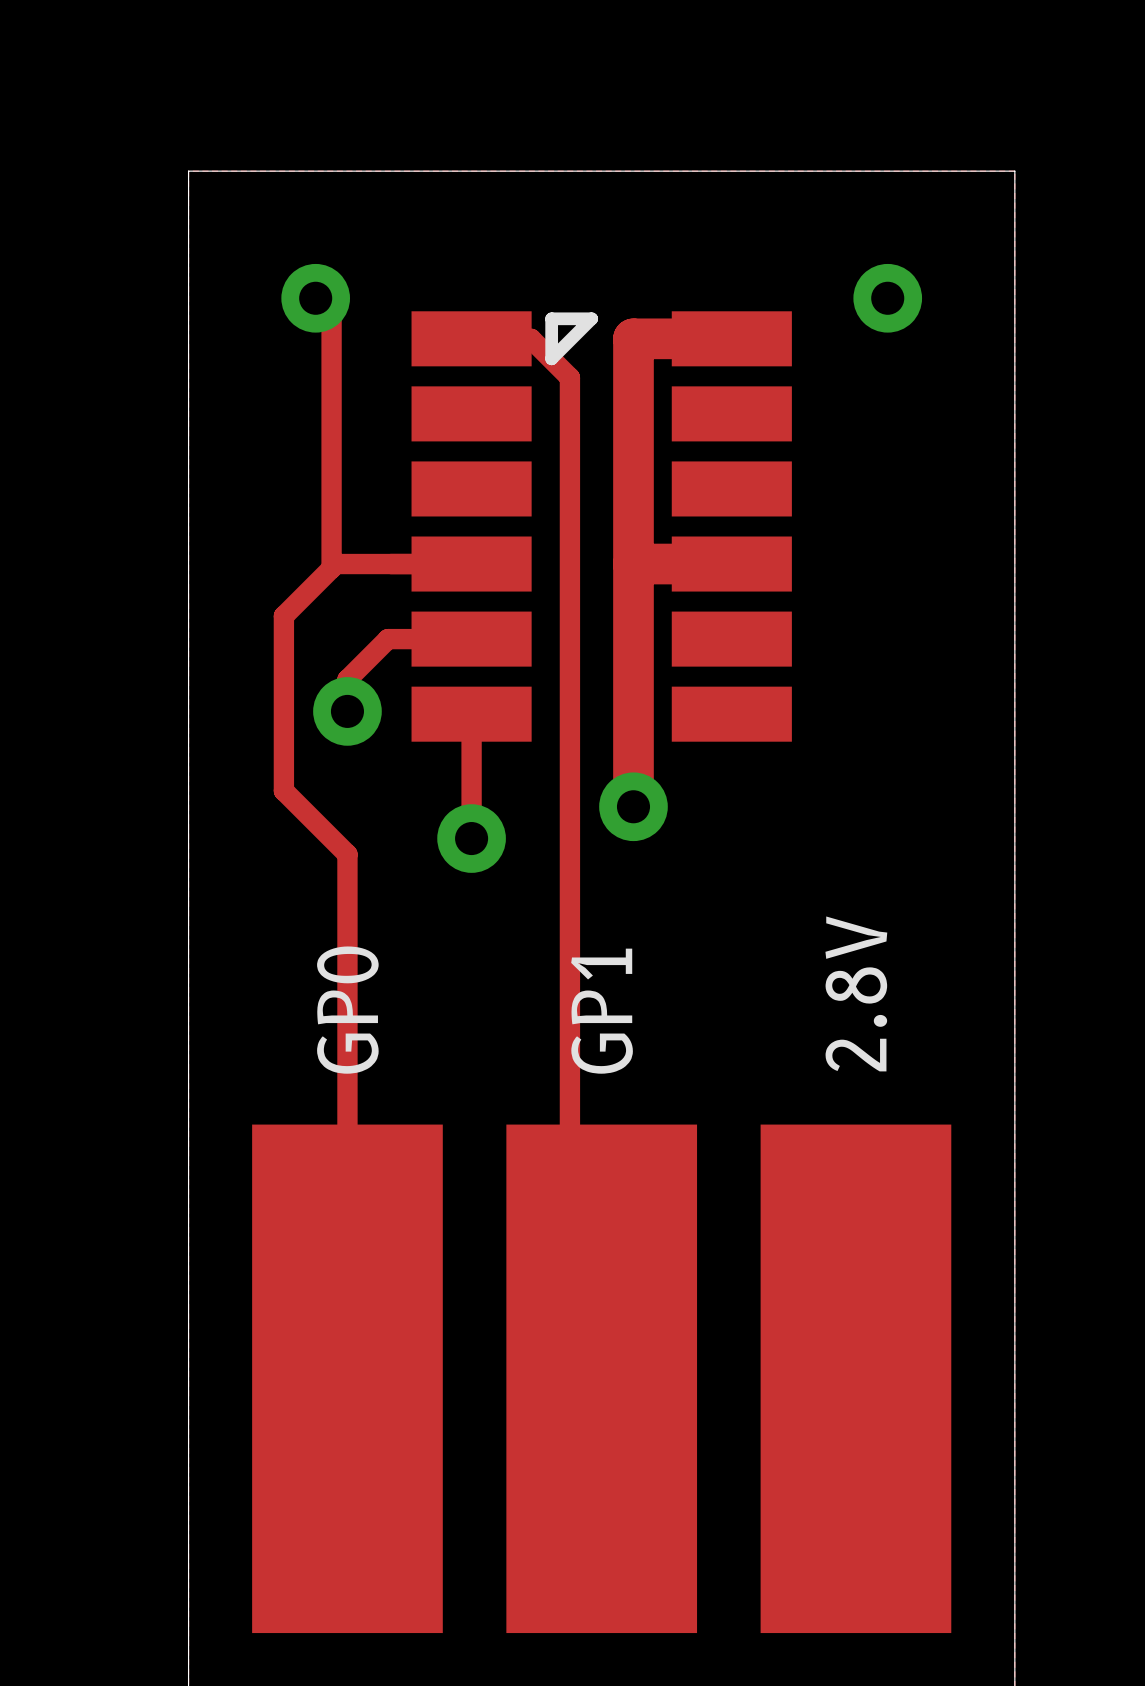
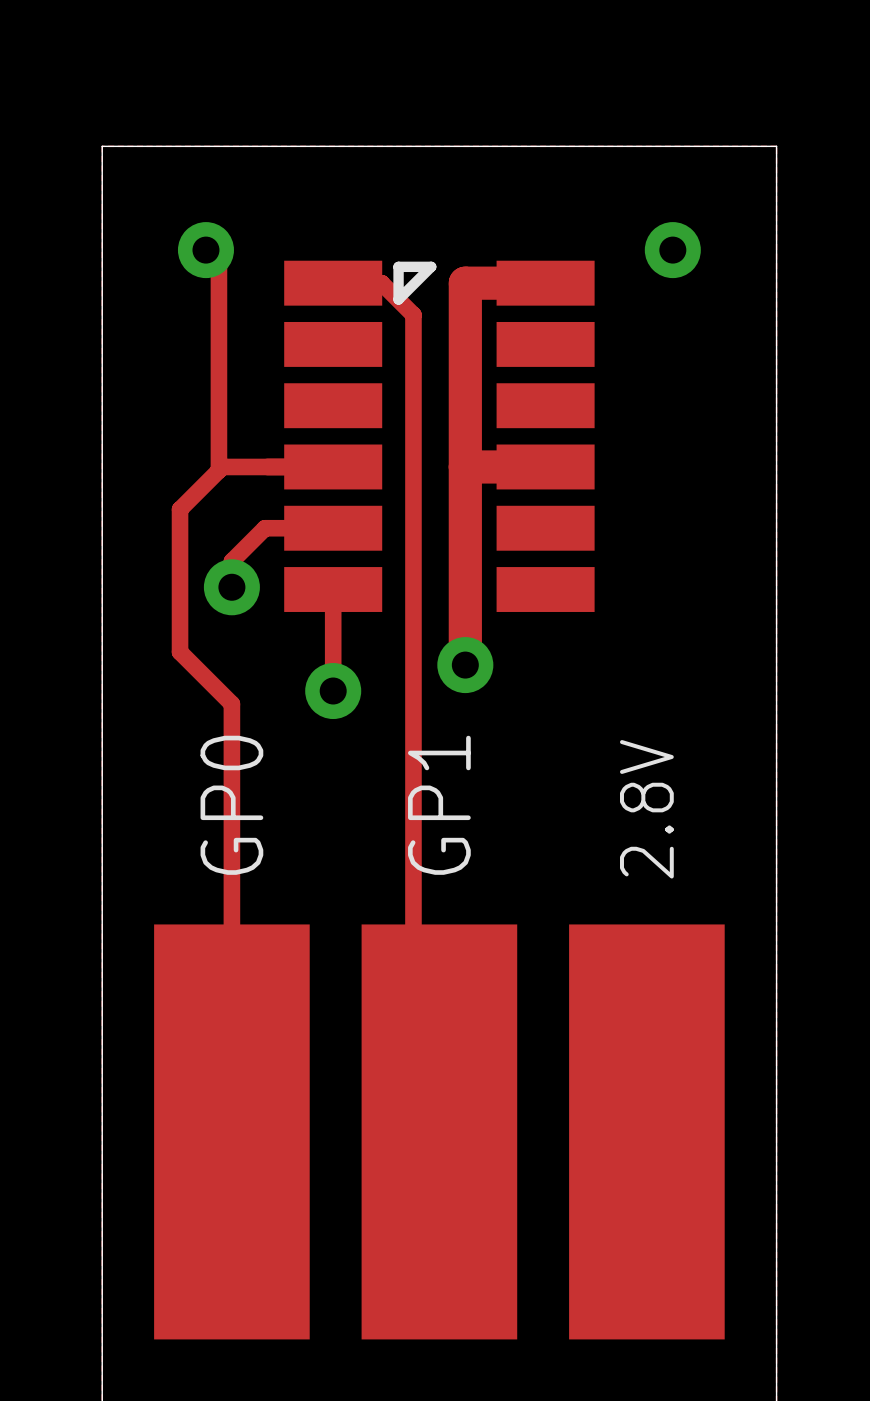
text position: GP0 (347, 1010) -> GP0 (231, 805)
text position: GP1 (602, 1011) -> GP1 (439, 805)

